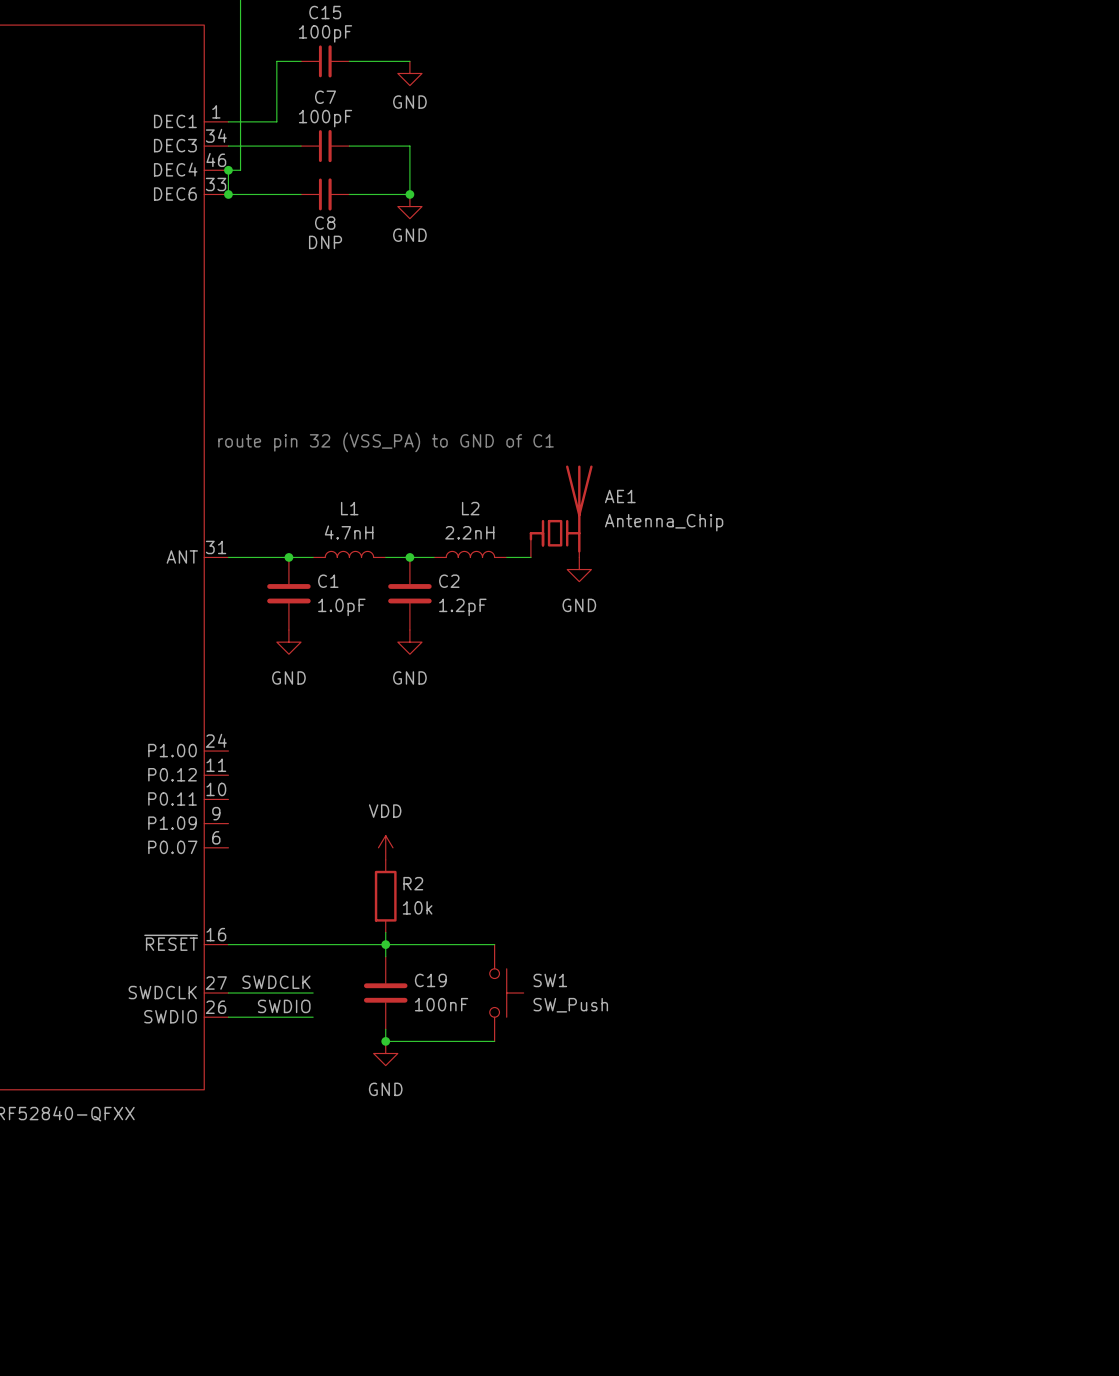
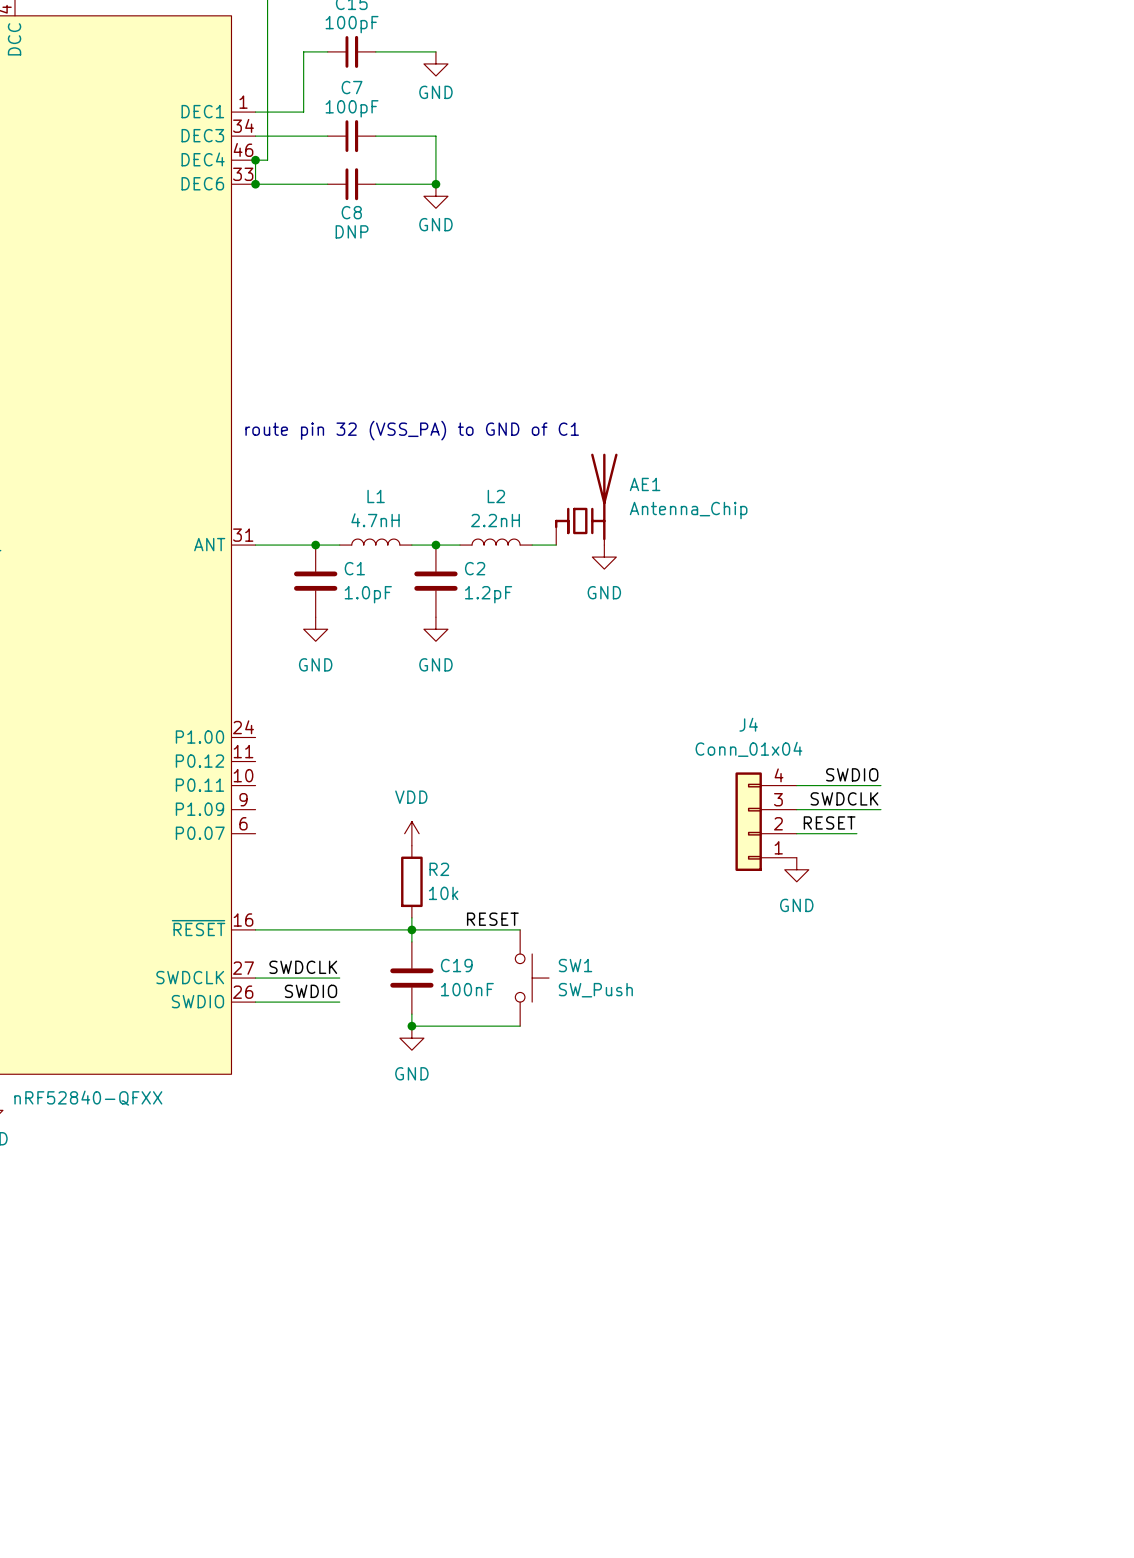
label: none -> SWDIO (852, 774)
wire: none -> (796, 785) (880, 785)
label: none -> SWDCLK (844, 798)
wire: none -> (796, 809) (880, 809)
J4: none -> Conn_01x04 (766, 821)
label: none -> RESET (829, 822)
wire: none -> (796, 833) (856, 833)
power symbol: none -> GND (796, 869)
label: none -> RESET (492, 919)

